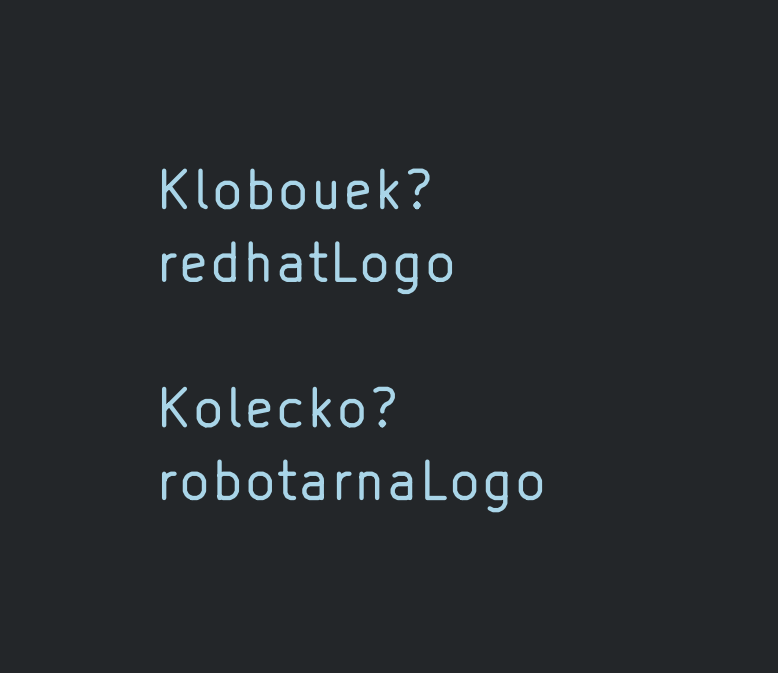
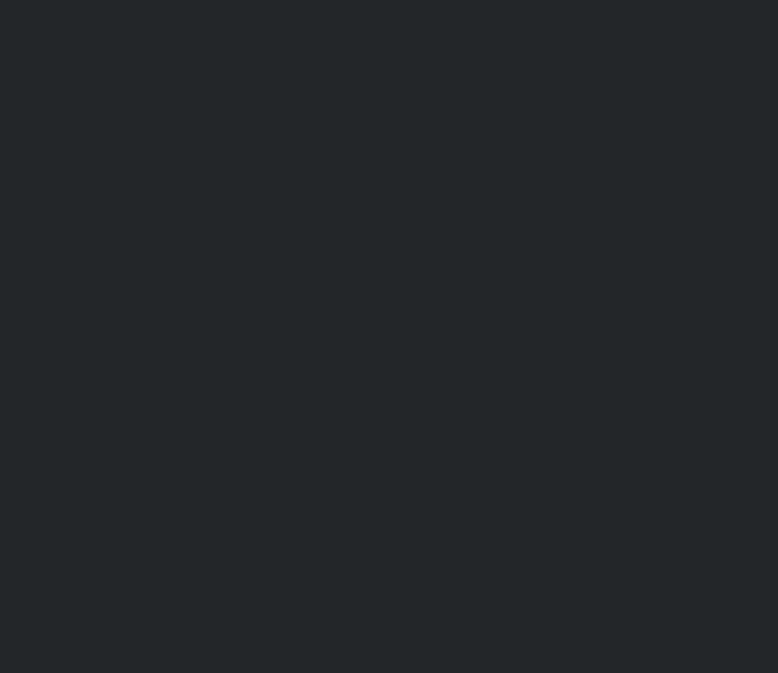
Klobouek?: redhatLogo (307, 231) -> none
Kolecko?: robotarnaLogo (352, 449) -> none

